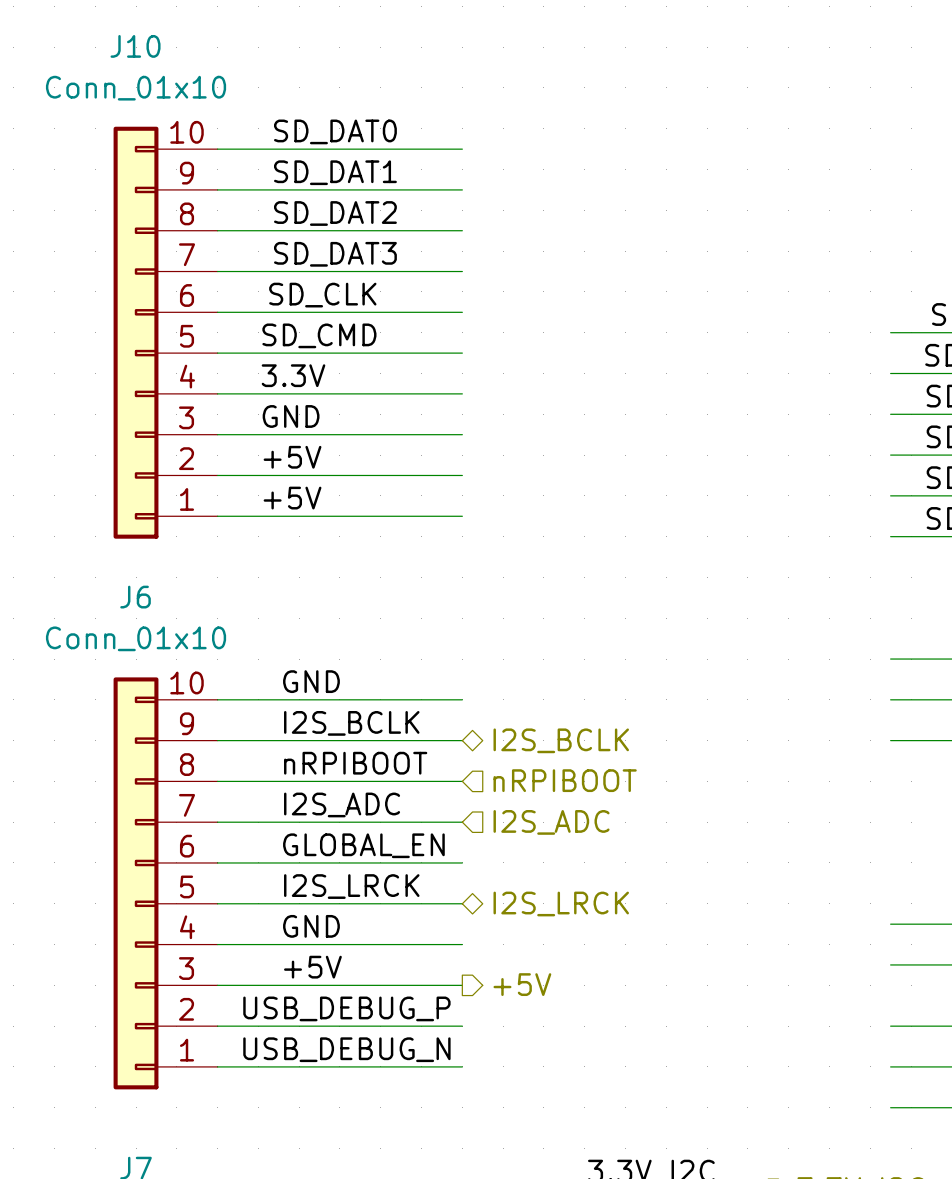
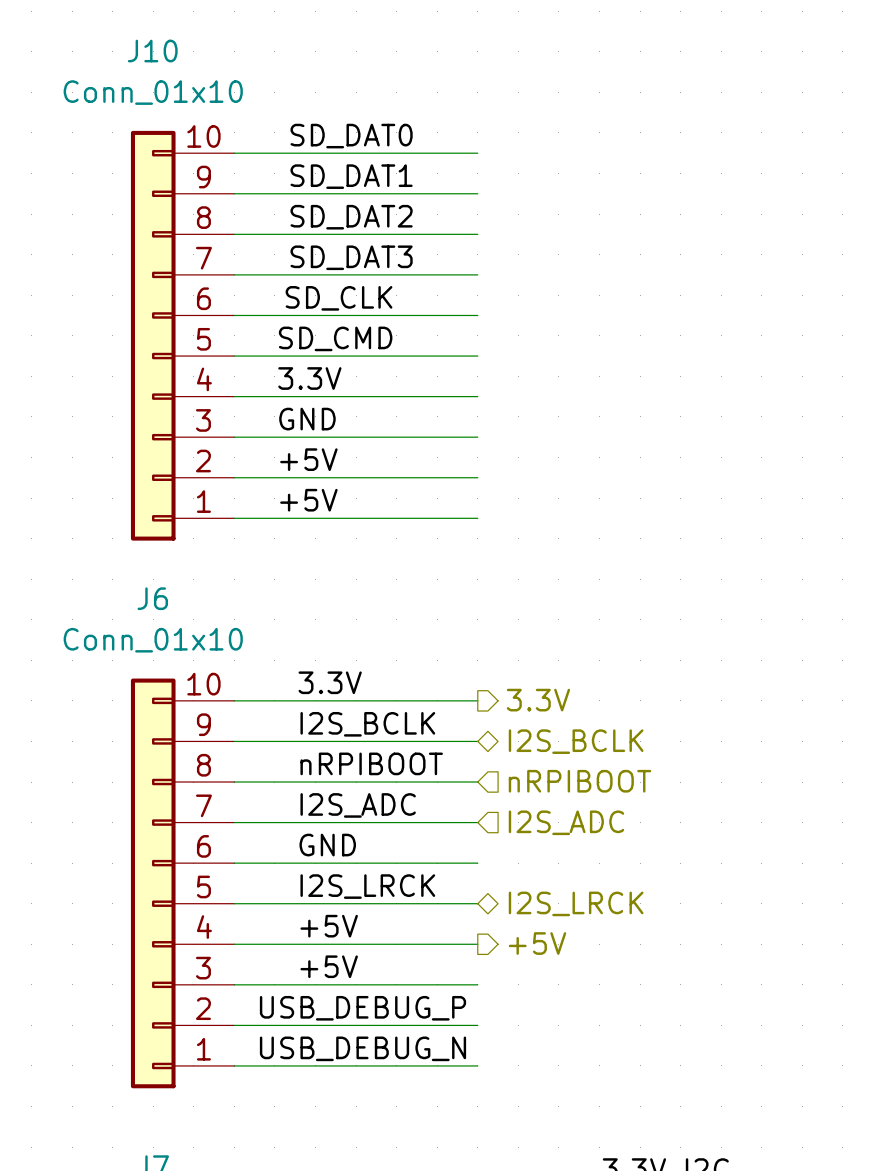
label: GND (311, 681) -> 3.3V (330, 682)
hierarchical label: none -> 3.3V (538, 700)
label: GLOBAL_EN (363, 845) -> GND (327, 845)
label: GND (311, 926) -> +5V (329, 926)
hierarchical label position: +5V (522, 984) -> +5V (537, 943)

